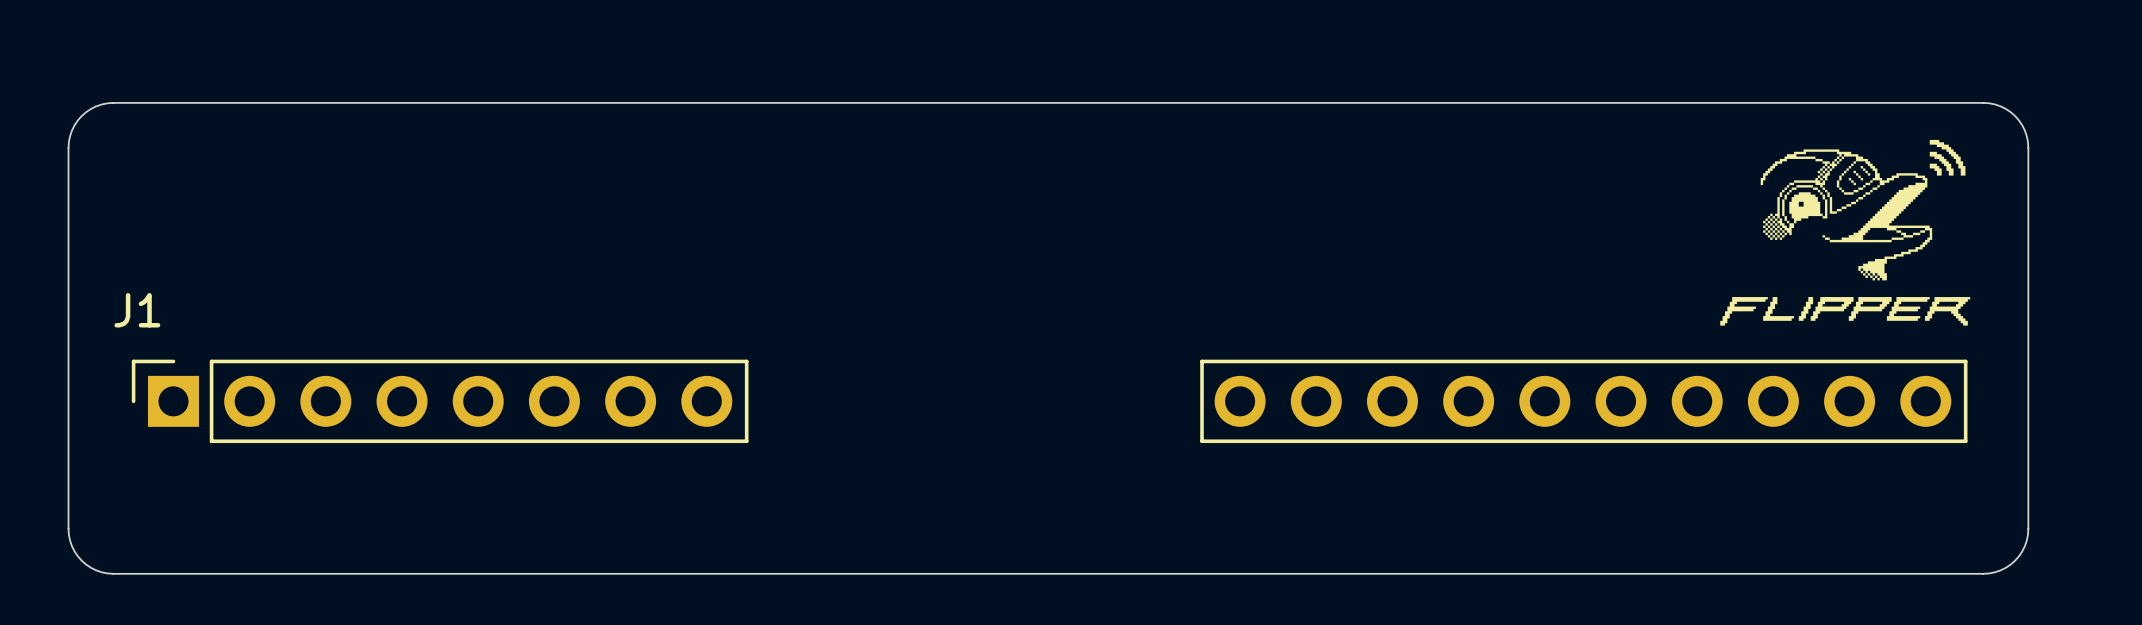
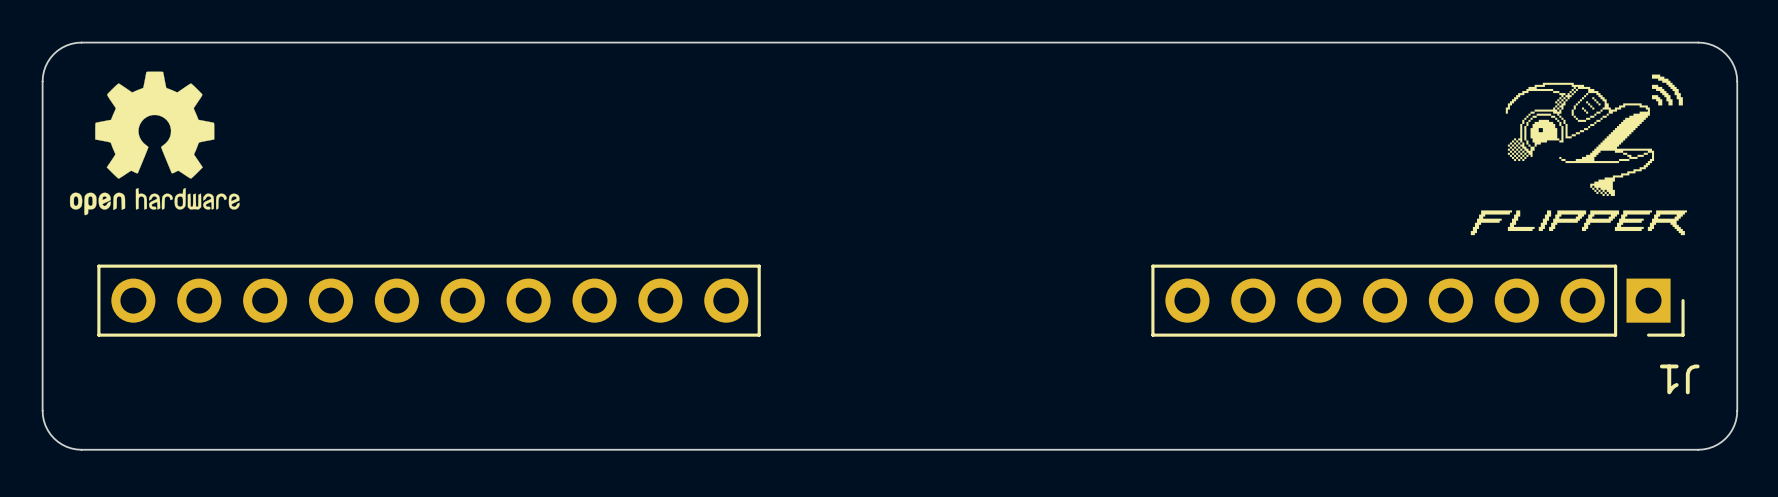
drawing: none -> [69, 71, 240, 216]
J1 rotation: 0° (1049, 401) -> 180° (890, 300)

